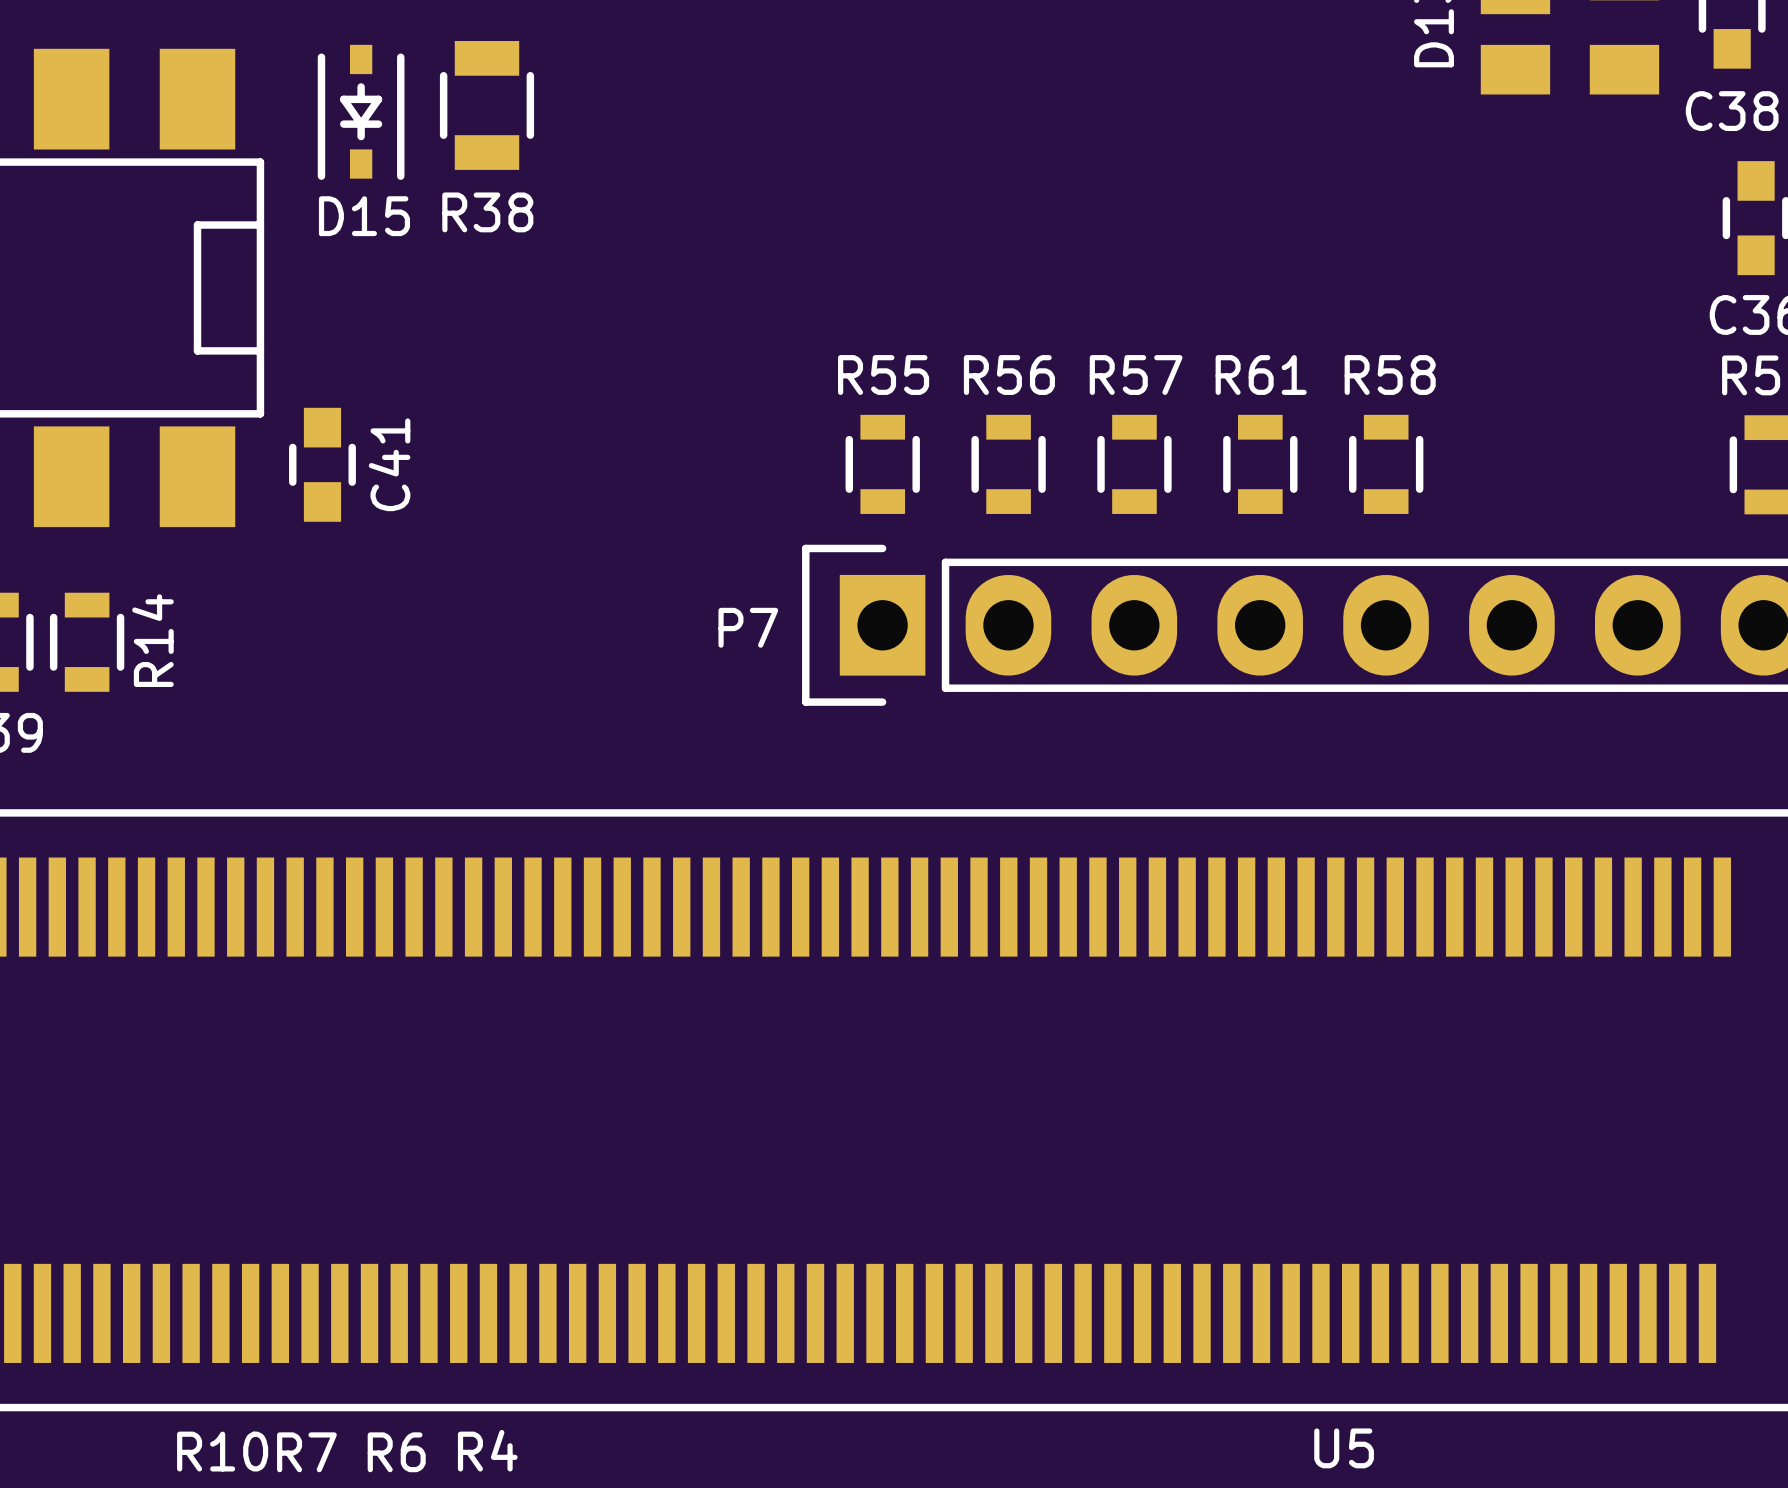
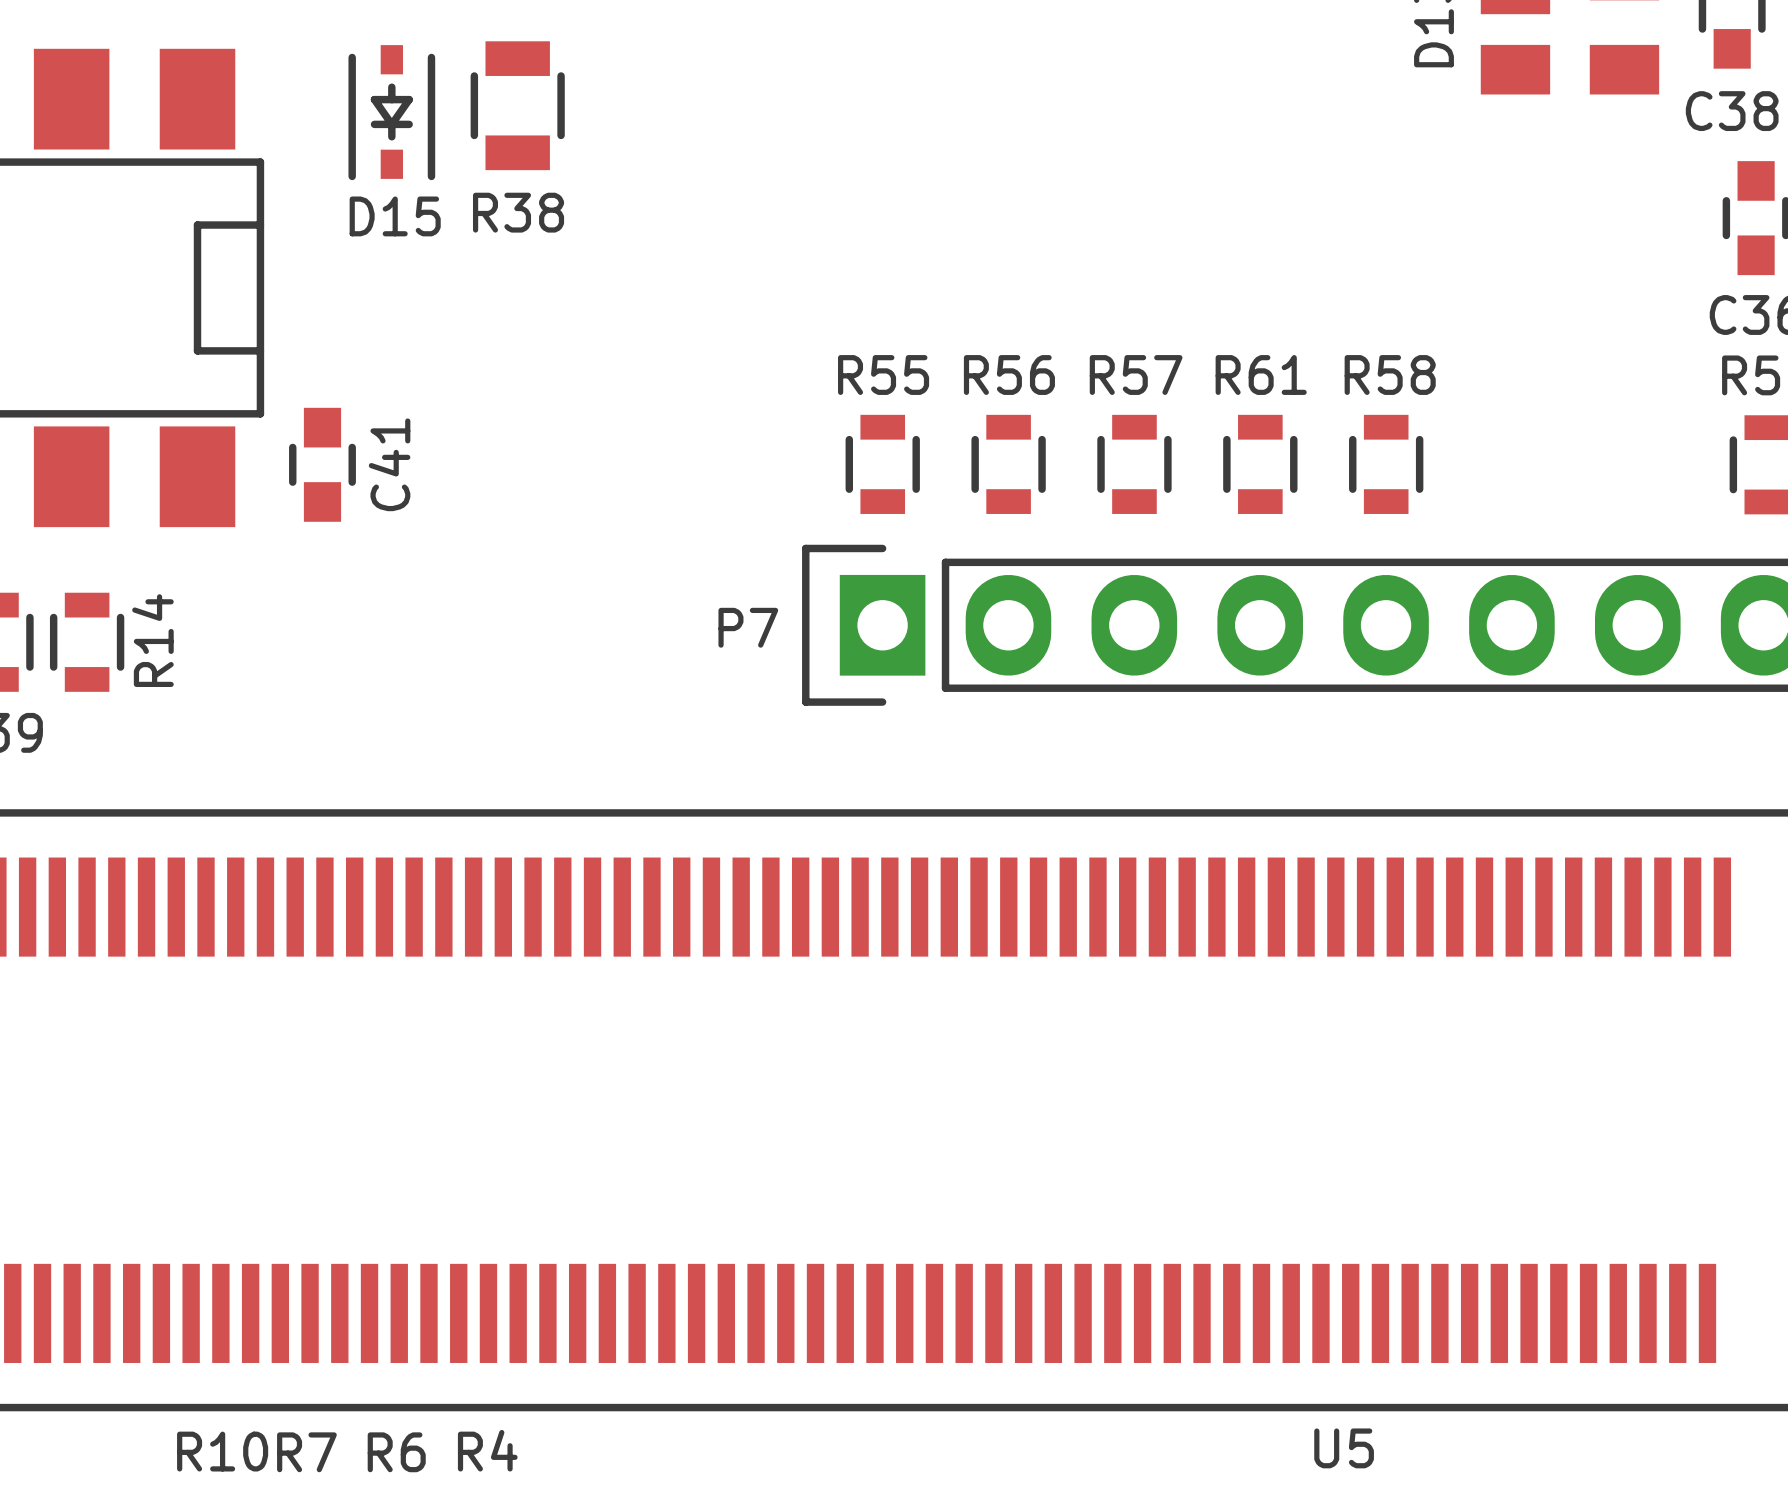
R38 position: (486, 105) -> (517, 105)
D15 position: (361, 112) -> (391, 112)

